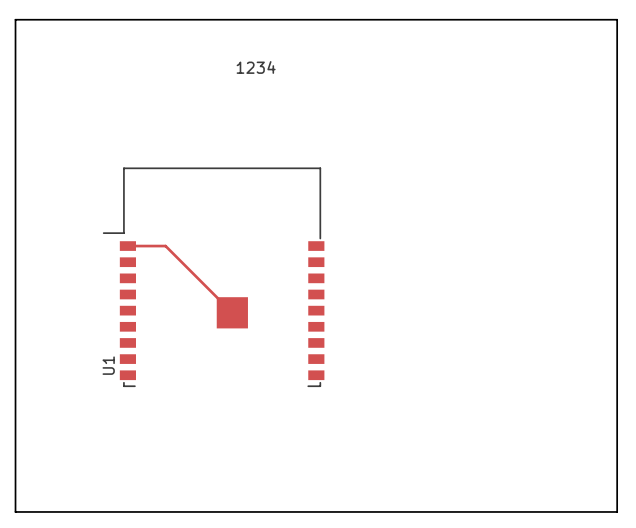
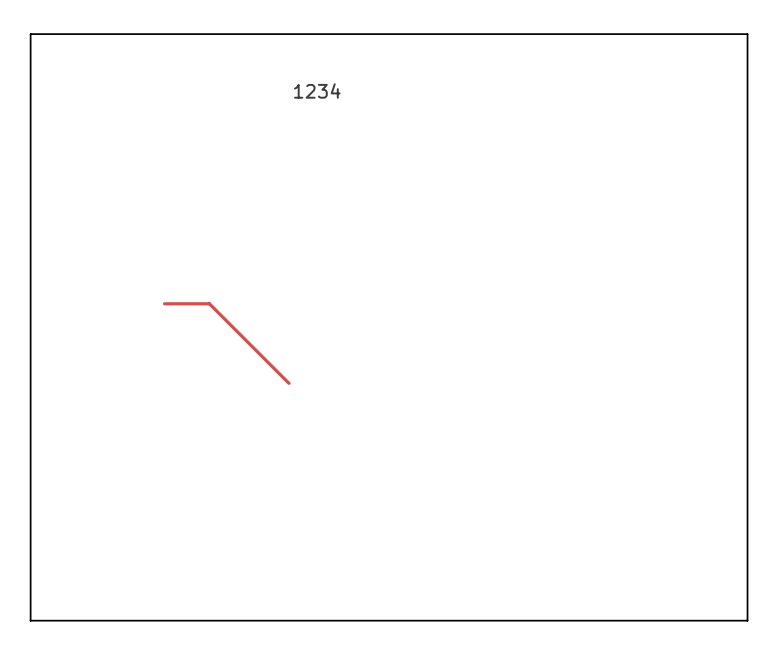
U1: (213, 277) -> none

